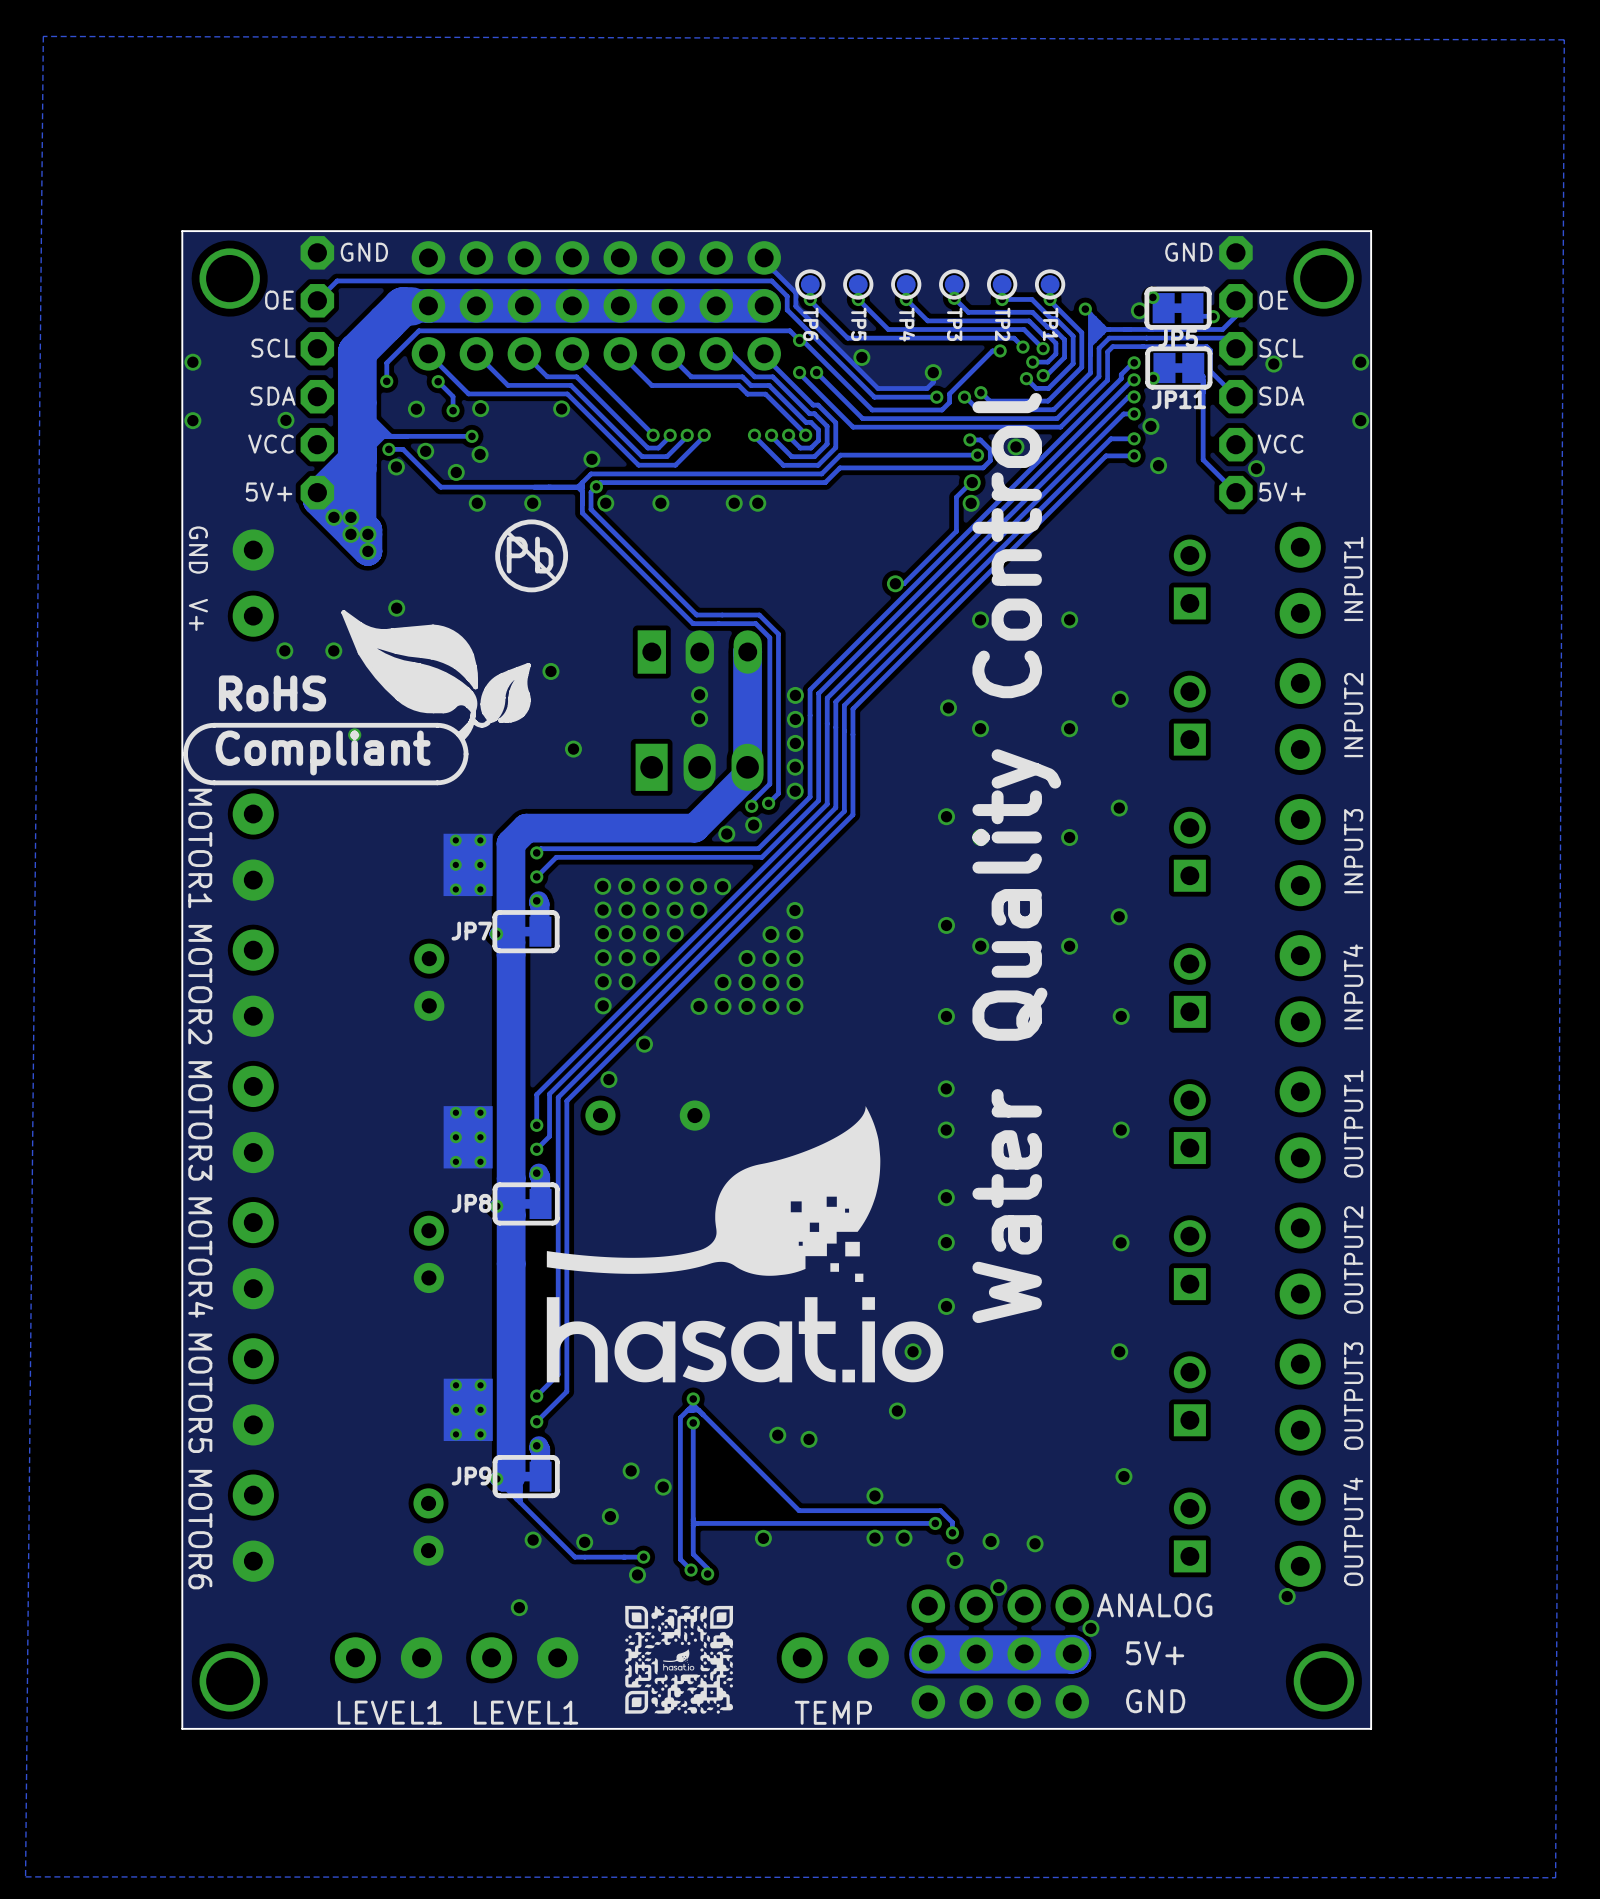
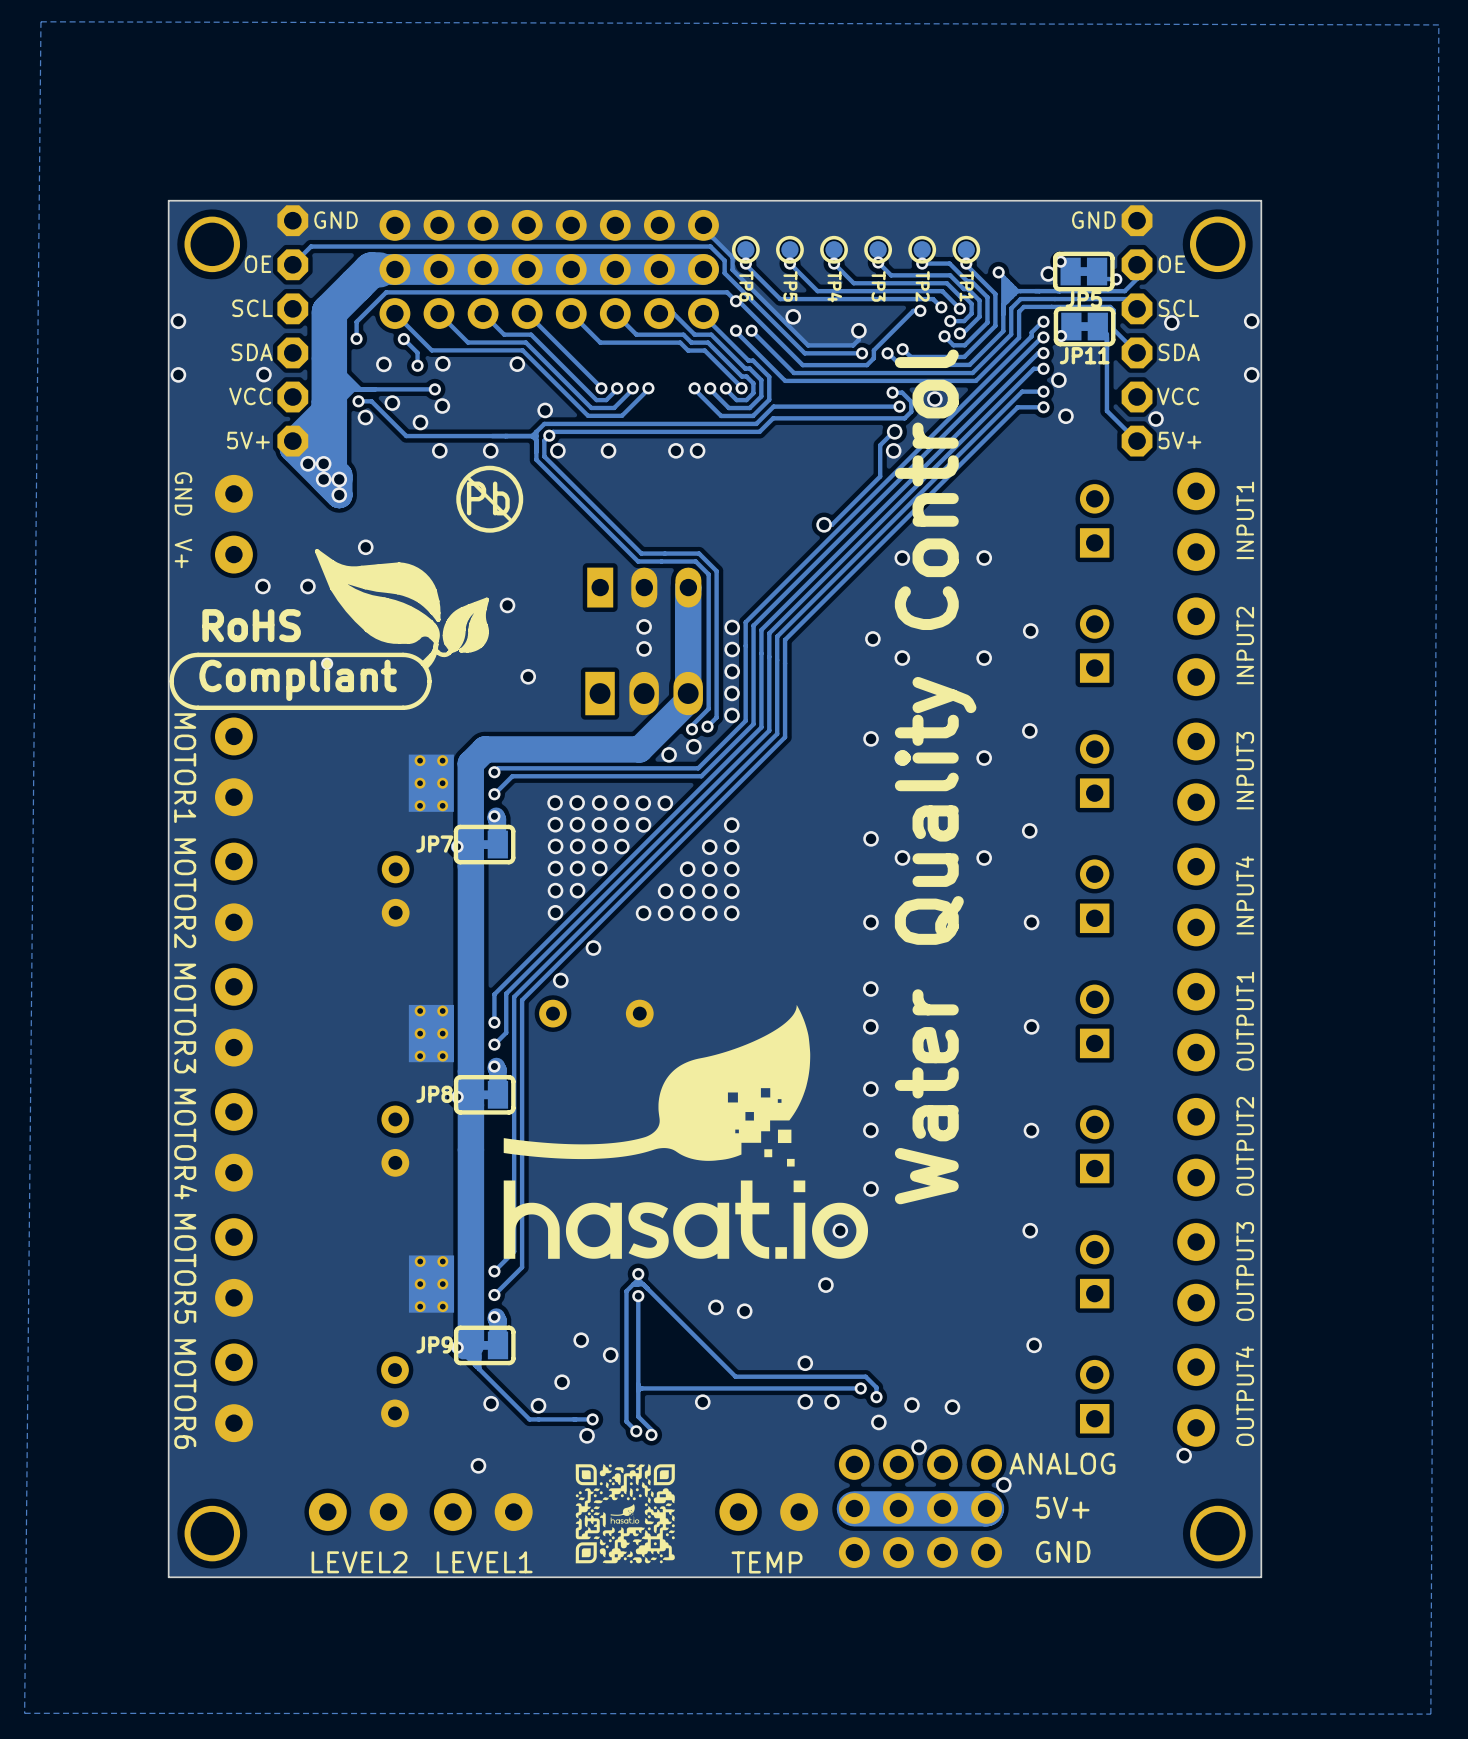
text: LEVEL1 (389, 1712) -> LEVEL2 (359, 1562)

